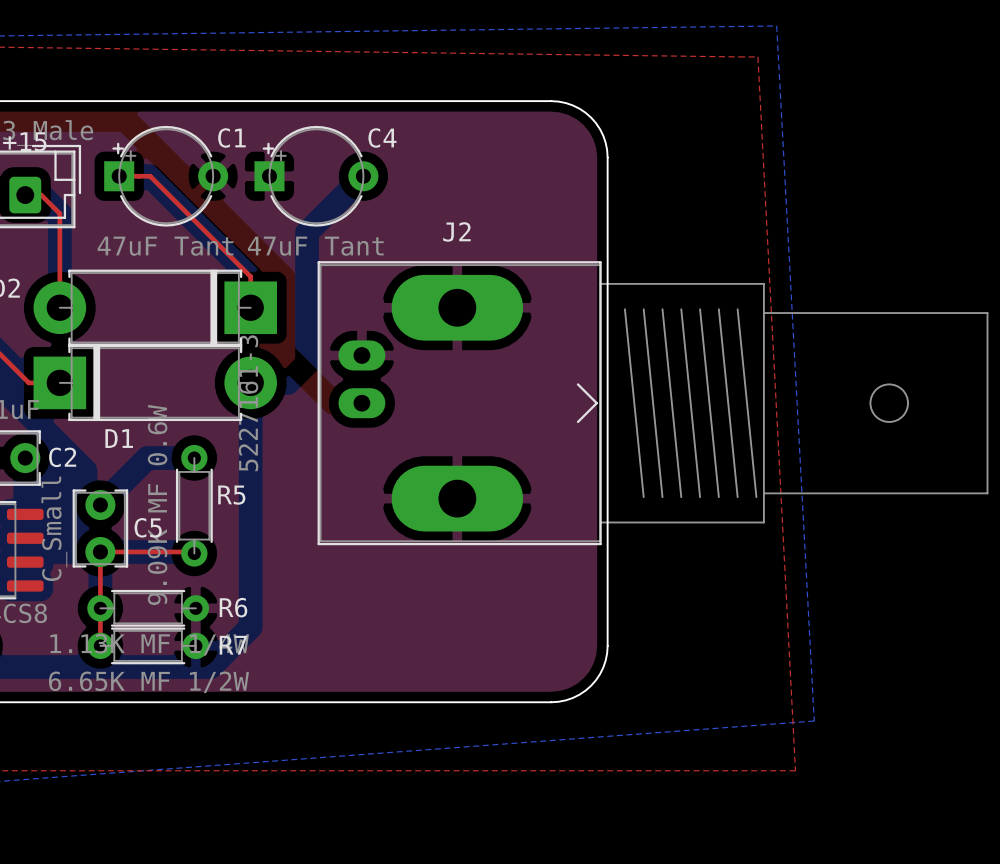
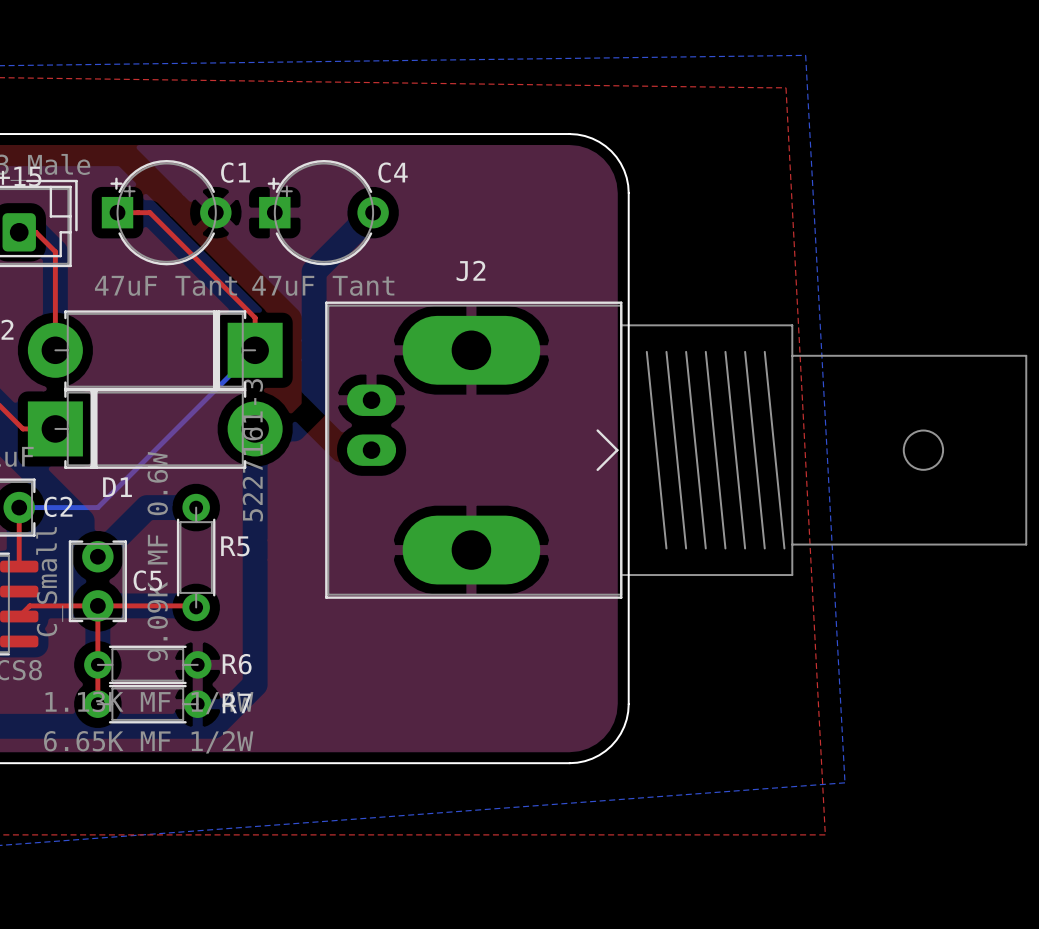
bottom track: none -> (255, 350) (97, 507) (19, 507)
top track: none -> (19, 507) (19, 566)
top track: none -> (97, 605) (29, 605) (19, 616)

